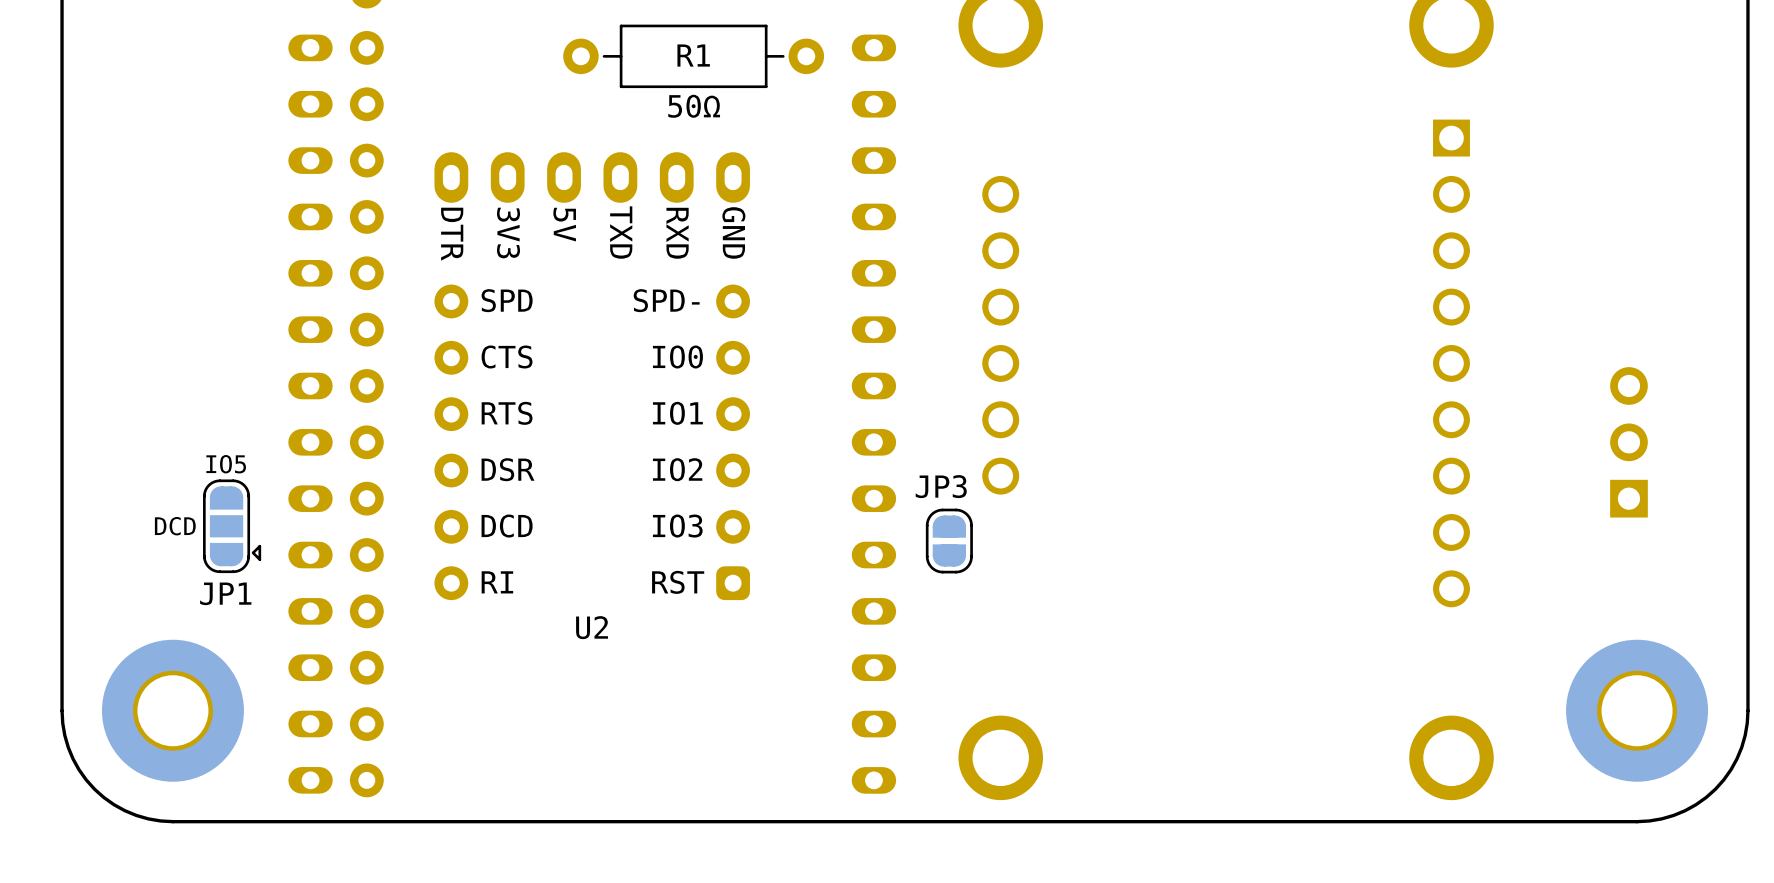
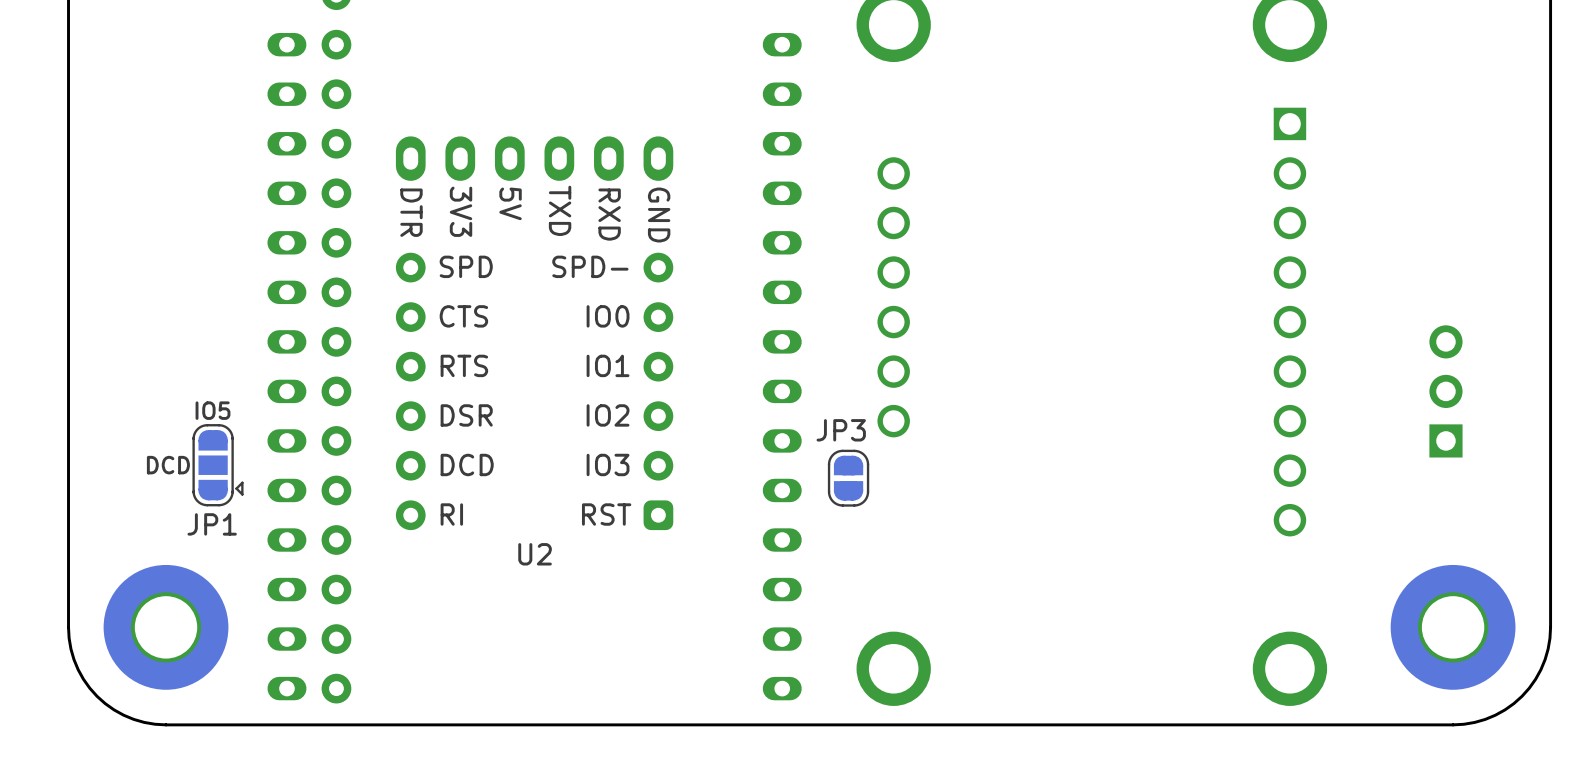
R1: (693, 56) -> none
text: 50Ω (694, 106) -> none

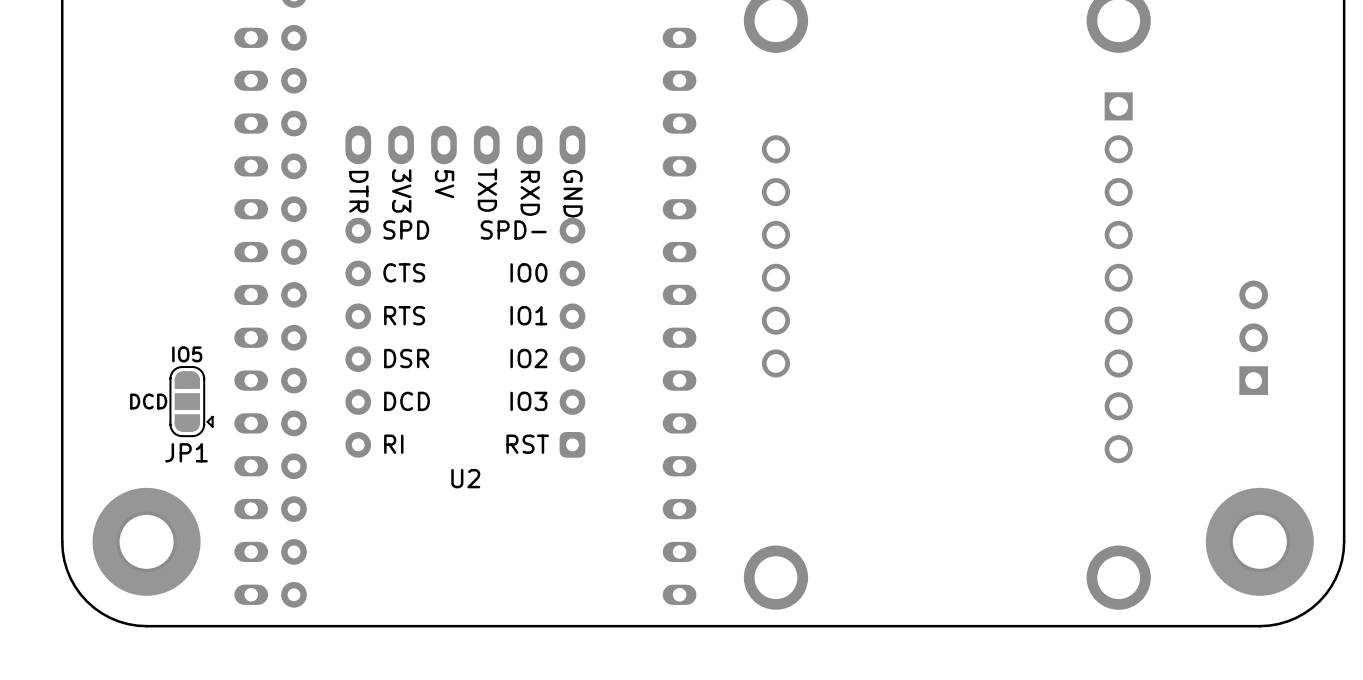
U2 footprint: [395, 136, 674, 531] -> [345, 125, 586, 458]
JP3: (848, 478) -> none

